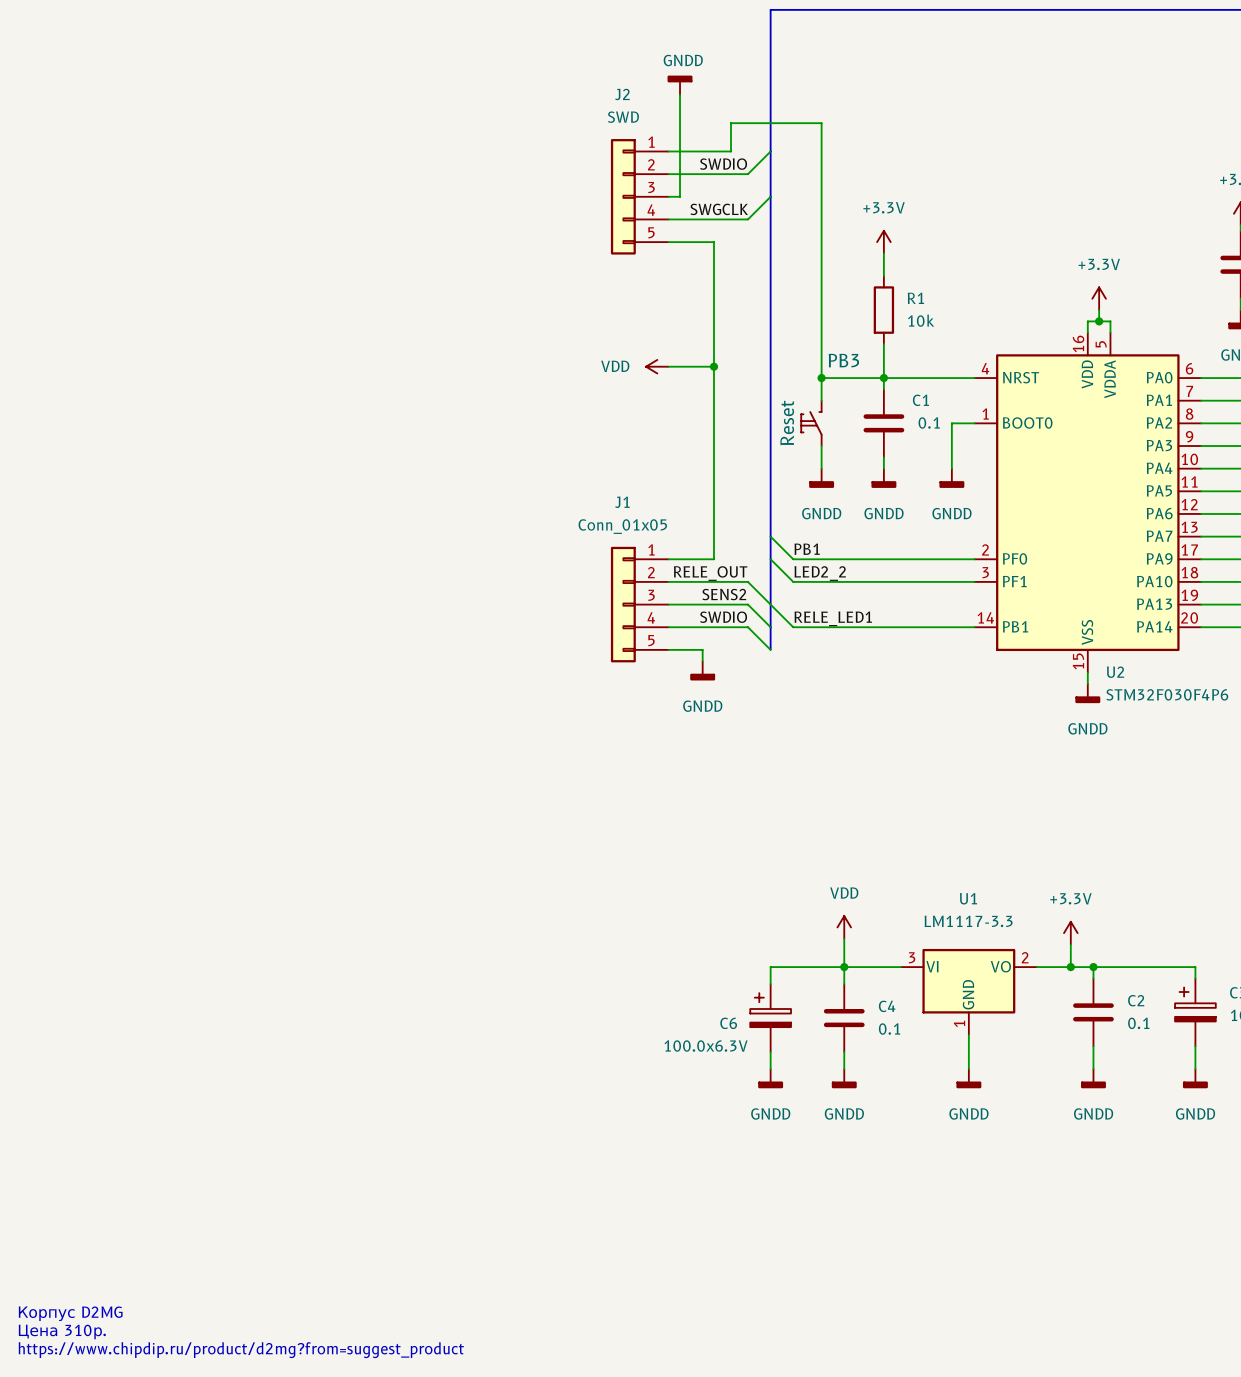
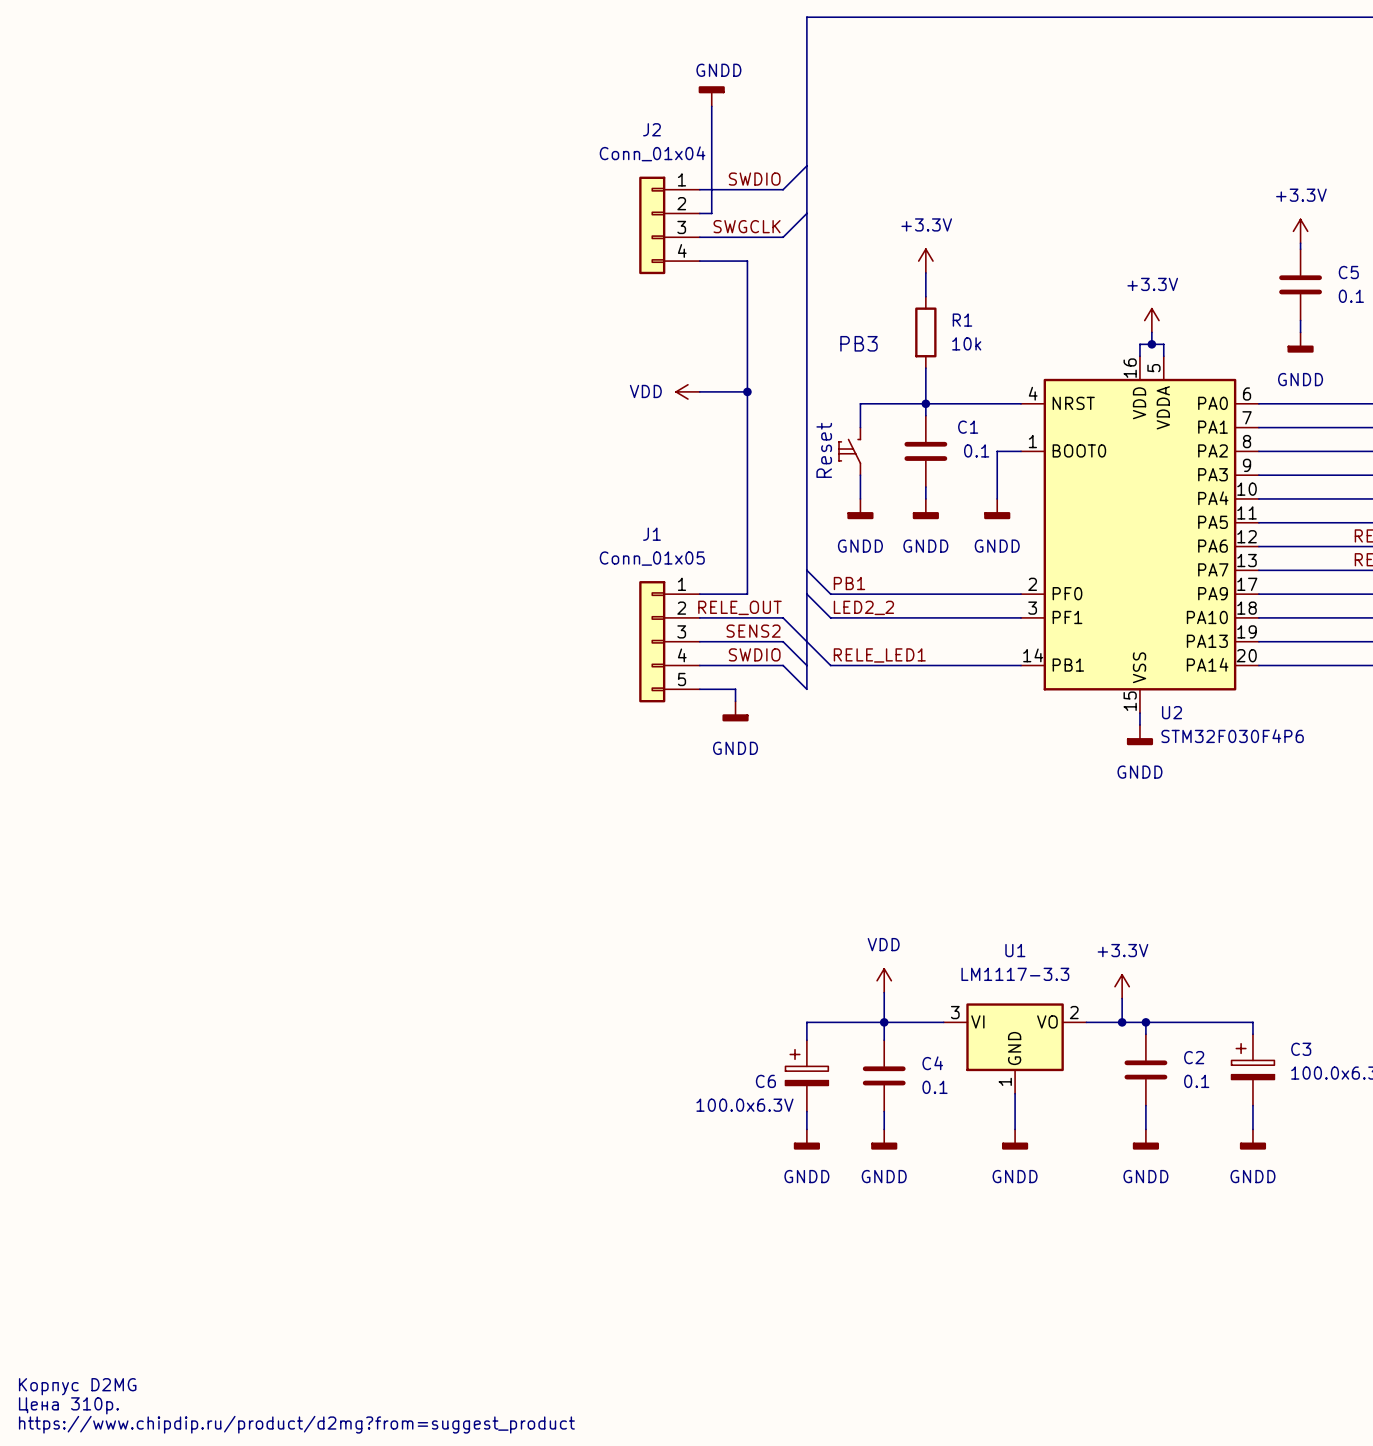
J2 value: SWD (623, 117) -> Conn_01x04 (652, 153)
J2 symbol: [610, 139, 669, 255] -> [639, 176, 700, 275]
wire: (668, 151) (730, 151) (730, 123) (821, 123) (821, 378) -> none
PB3 name position: PB3 (843, 360) -> PB3 (858, 343)
junction: (821, 378) -> none

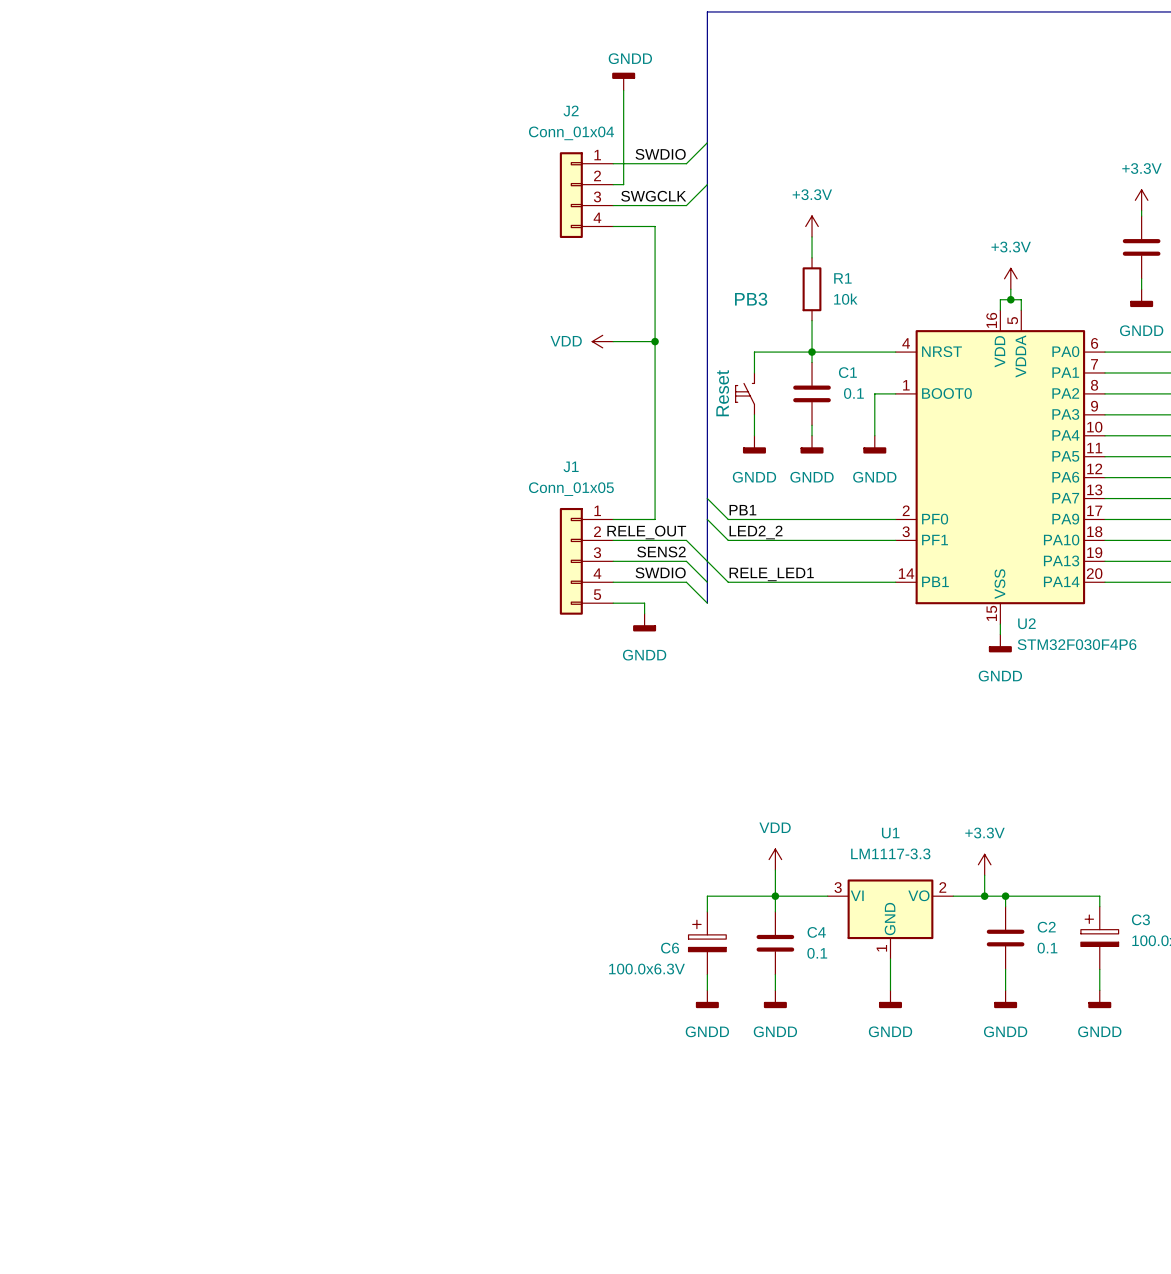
text: Корпус D2MG (77, 1386) -> none
text: Цена 310р. (68, 1405) -> none
text: https://www.chipdip.ru/product/d2mg?from=suggest_product (296, 1424) -> none

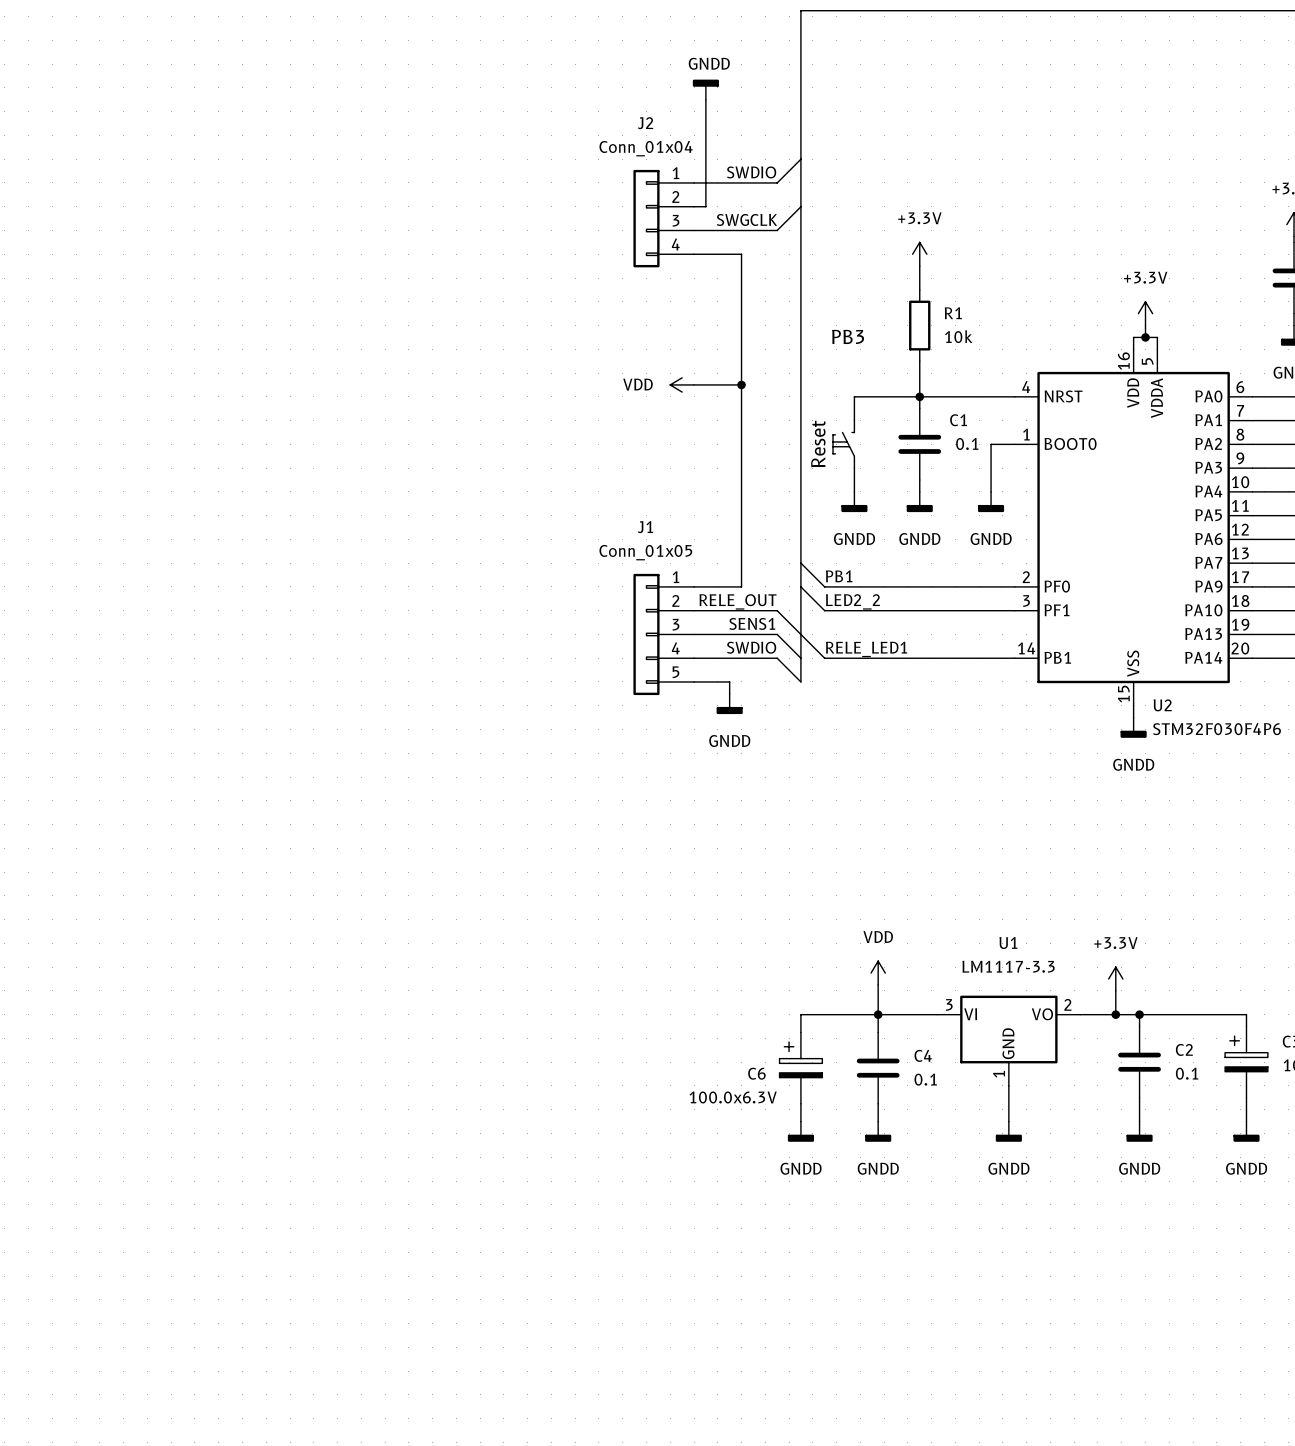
label: SENS2 (661, 552) -> SENS1 (752, 623)

